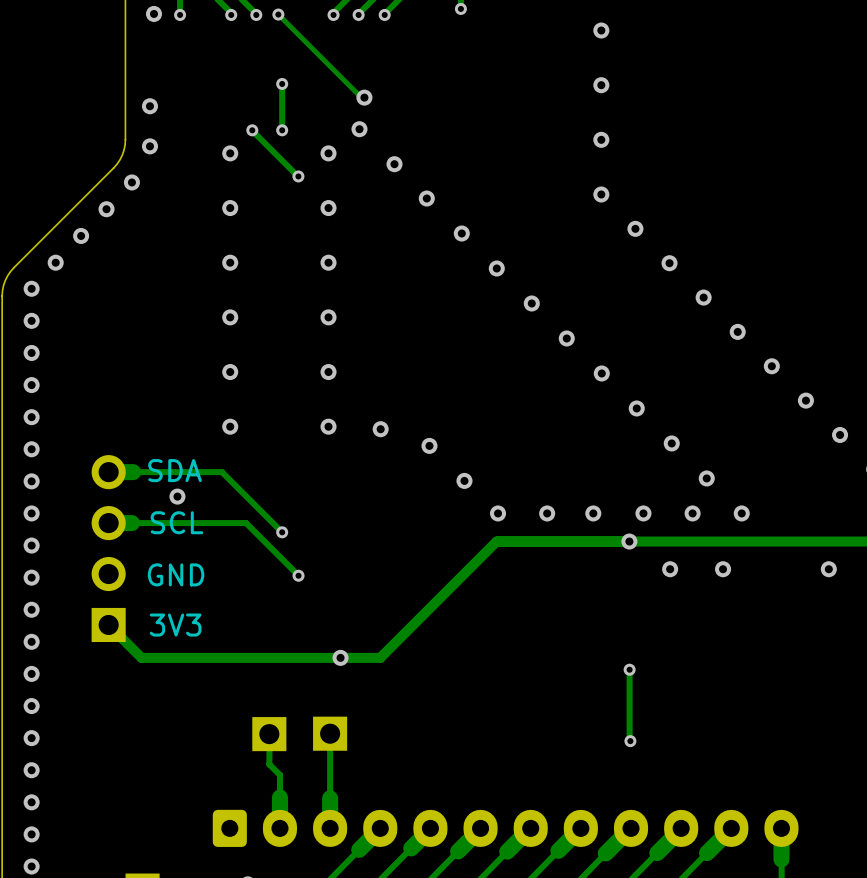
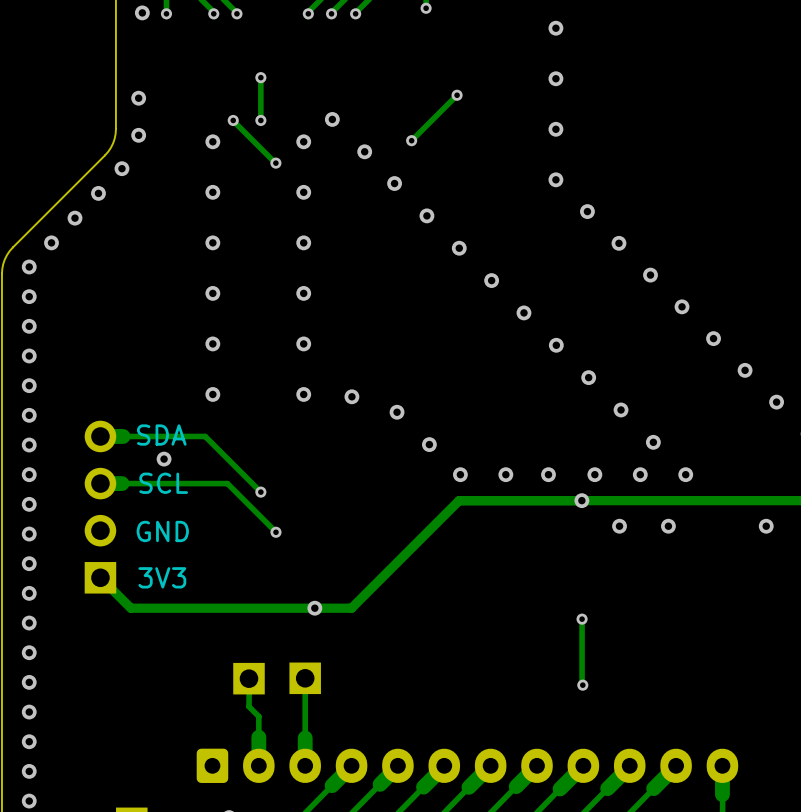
track: (278, 14) (361, 97) -> none
via: (278, 14) -> none
via: (364, 97) -> none
track: none -> (457, 95) (411, 140)
via: none -> (457, 95)
via: none -> (411, 140)

